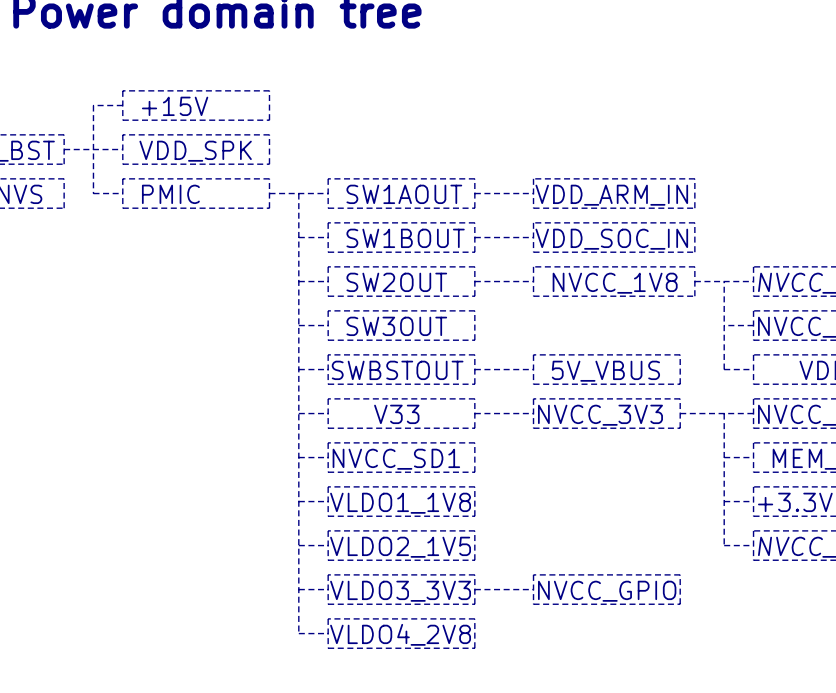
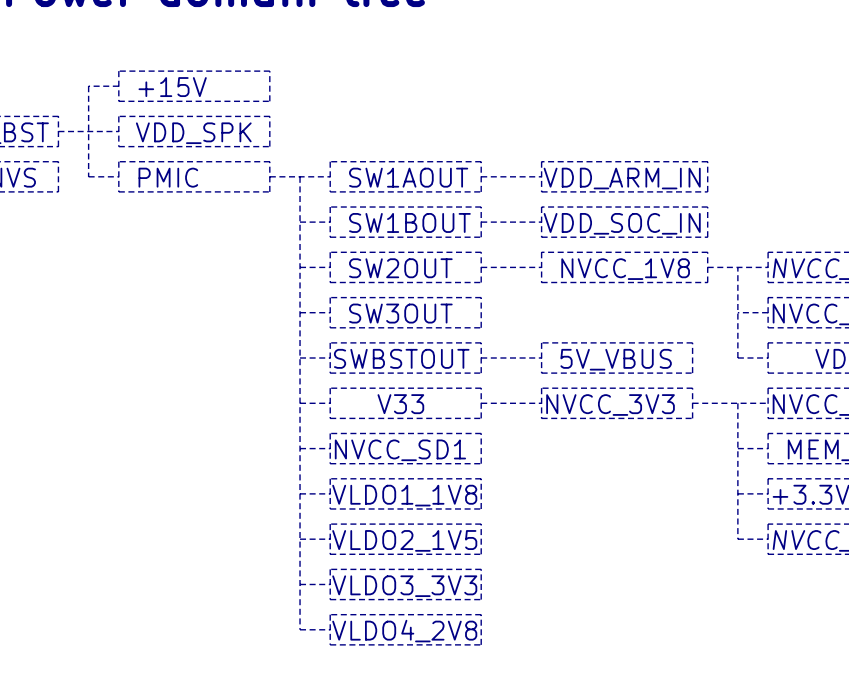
line: (533, 574) (680, 574) (680, 604) (533, 604) (533, 574) -> none
line: (474, 589) (533, 589) -> none
text: NVCC_GPIO (607, 591) -> none

